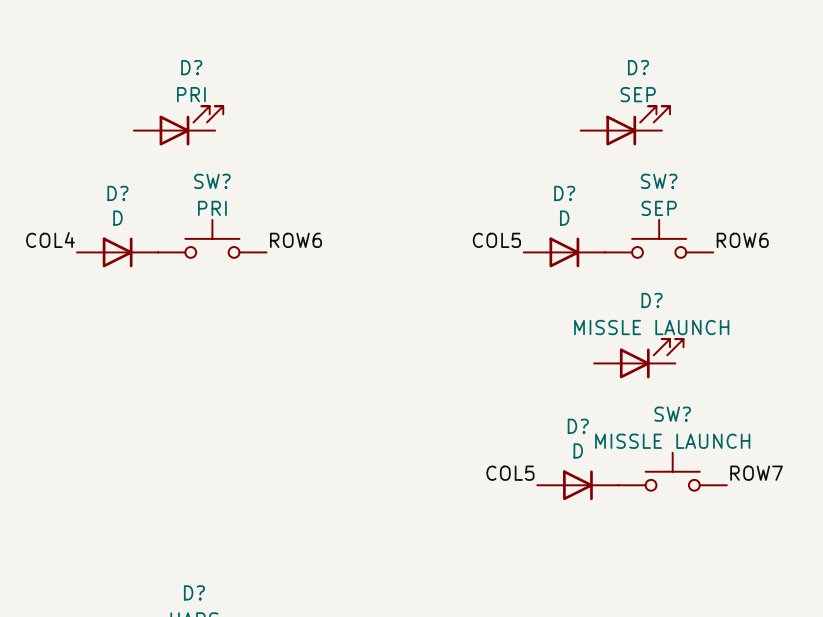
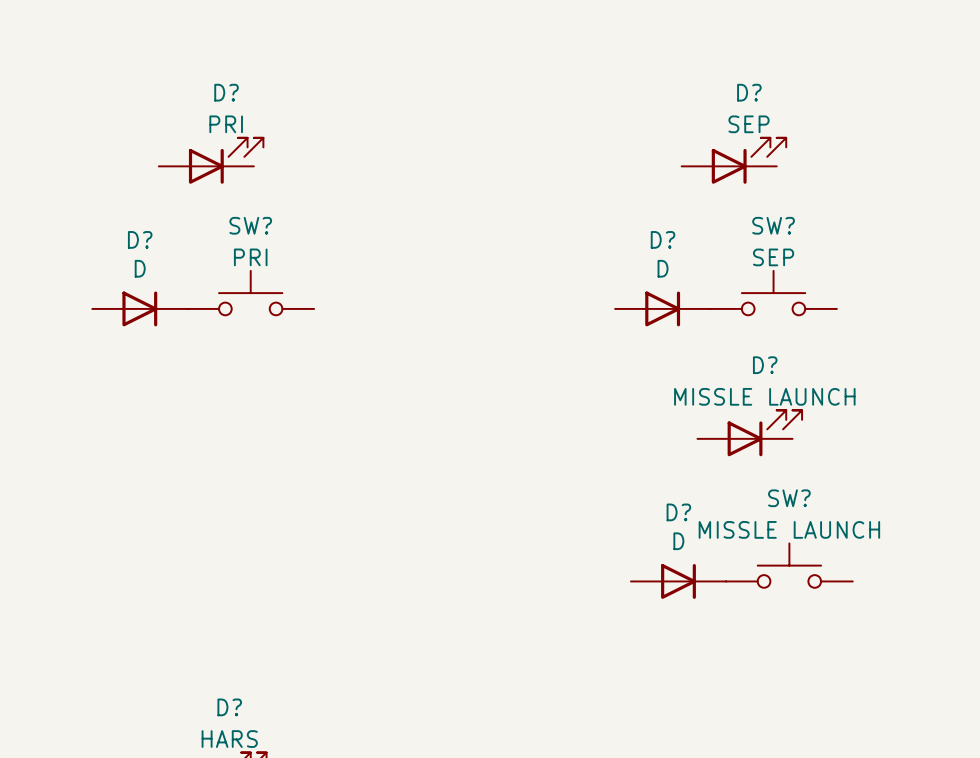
label: COL4 (50, 240) -> none
label: ROW6 (295, 240) -> none
label: COL5 (496, 240) -> none
label: ROW6 (742, 240) -> none
label: COL5 (510, 473) -> none
label: ROW7 (756, 473) -> none

